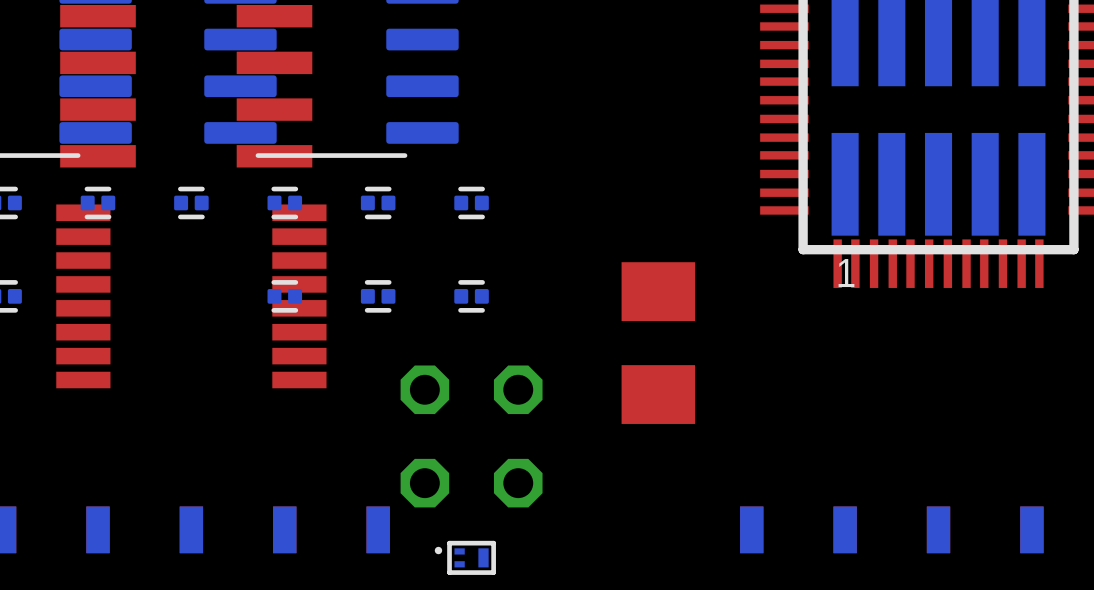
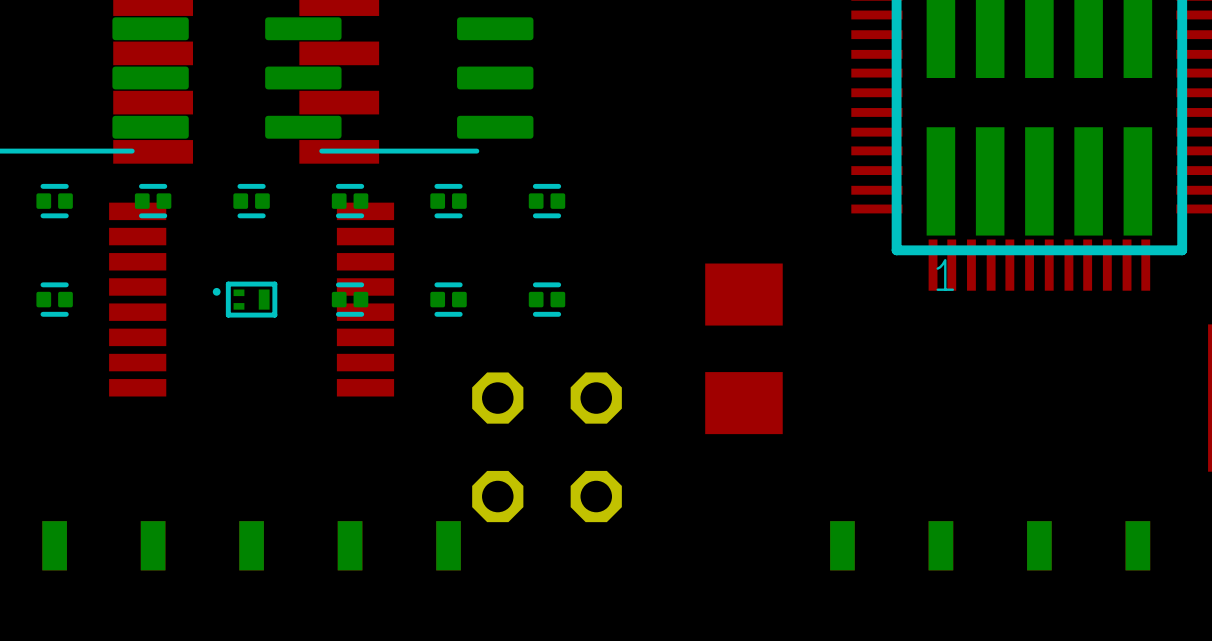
part position: (465, 557) -> (245, 299)

